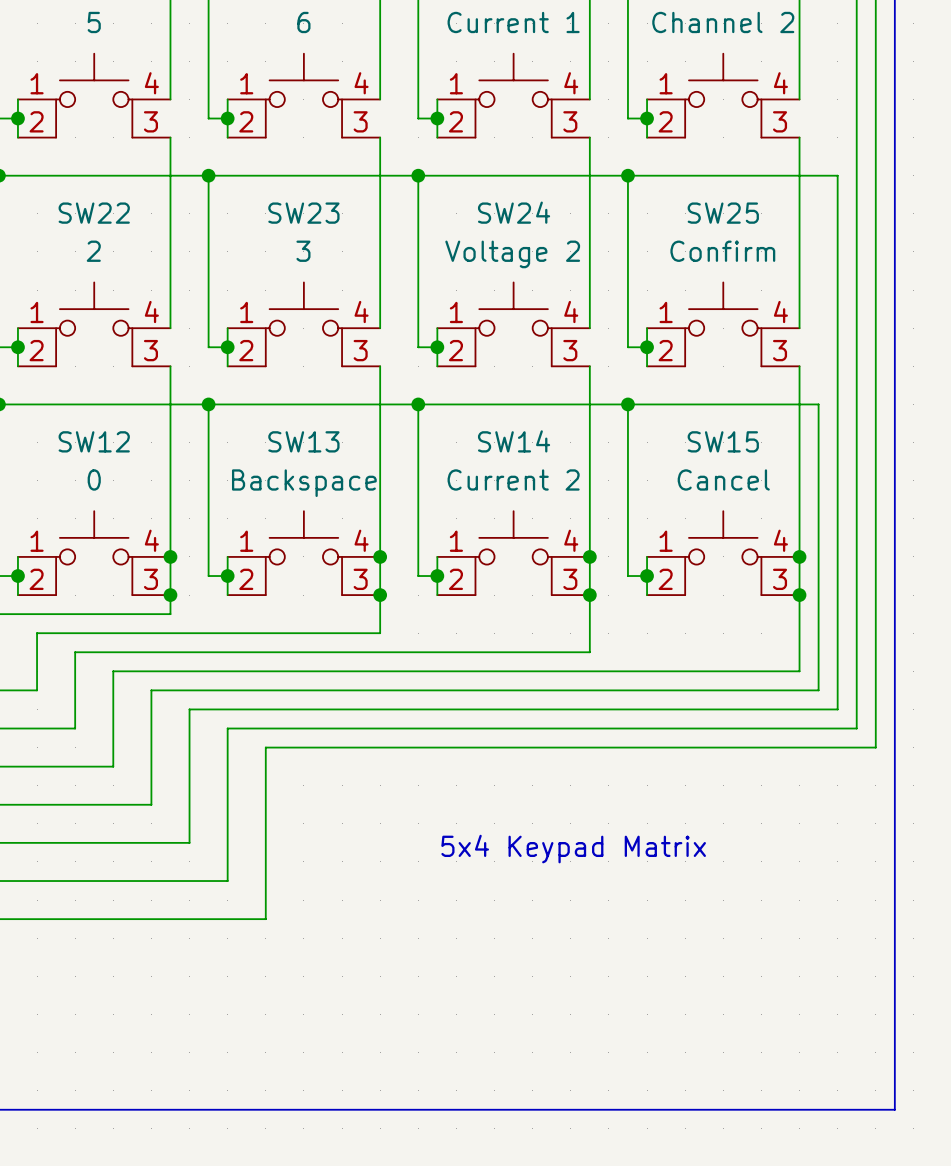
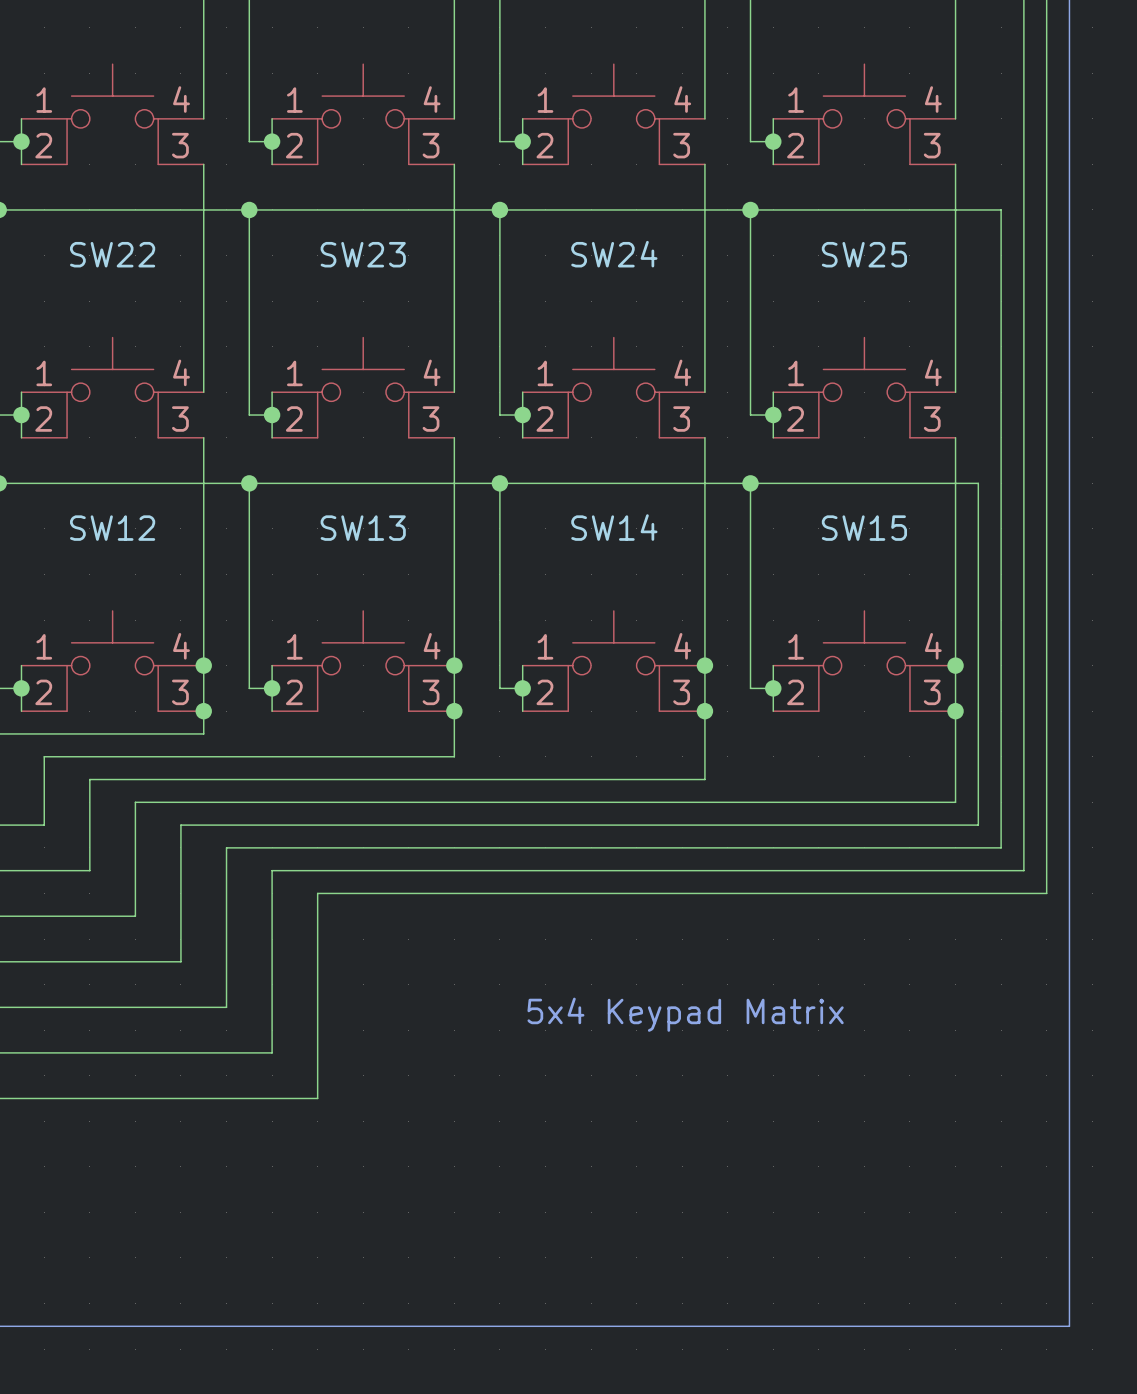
part value: 5 (94, 22) -> none
part value: 6 (303, 22) -> none
part value: Current 1 (513, 22) -> none
part value: Channel 2 (723, 22) -> none
SW22 value: 2 (93, 251) -> none
SW23 value: 3 (303, 251) -> none
SW25 value: Confirm (722, 251) -> none
SW24 value: Voltage 2 (512, 254) -> none
SW12 value: 0 (94, 479) -> none
SW14 value: Current 2 (513, 479) -> none
SW15 value: Cancel (723, 479) -> none
SW13 value: Backspace (304, 483) -> none

